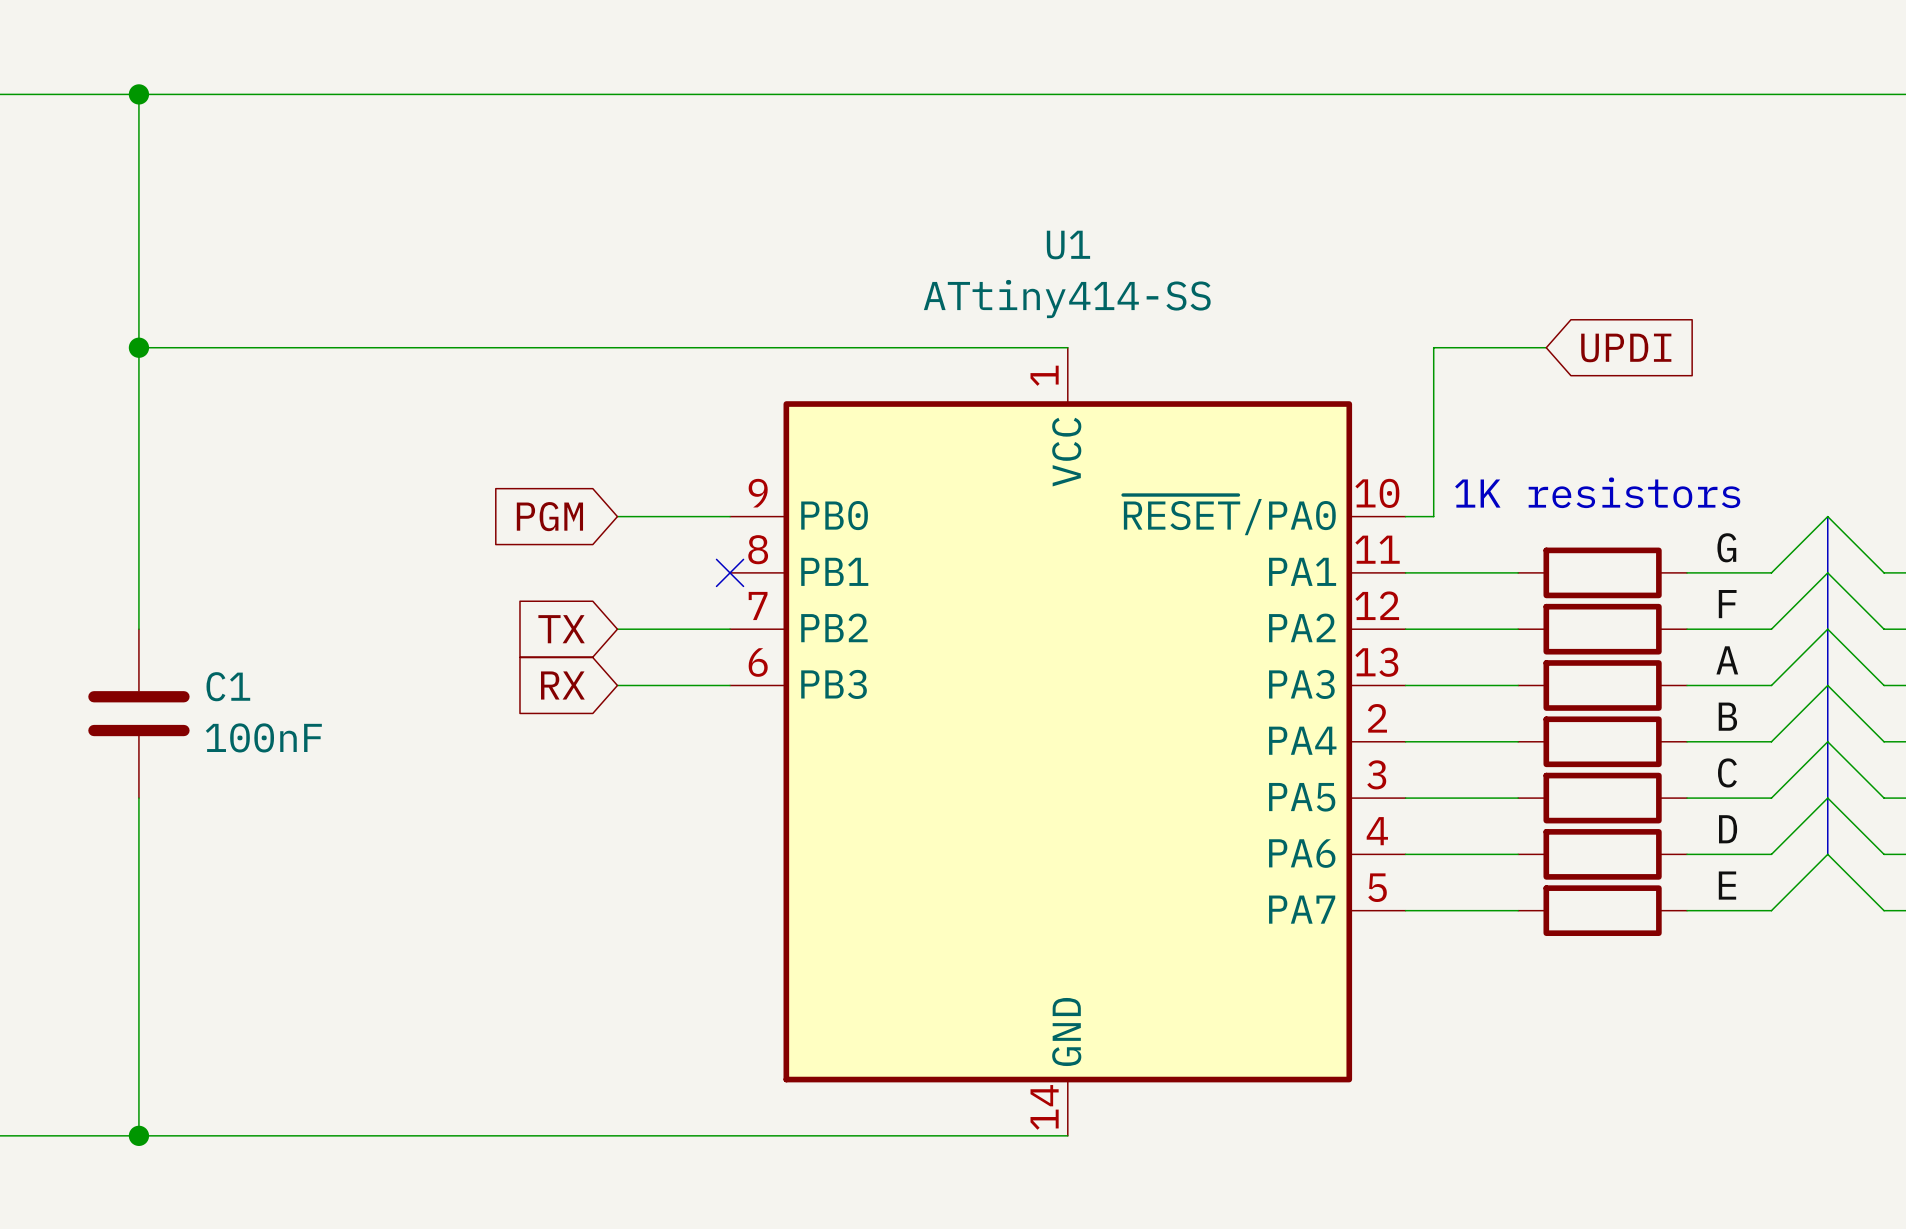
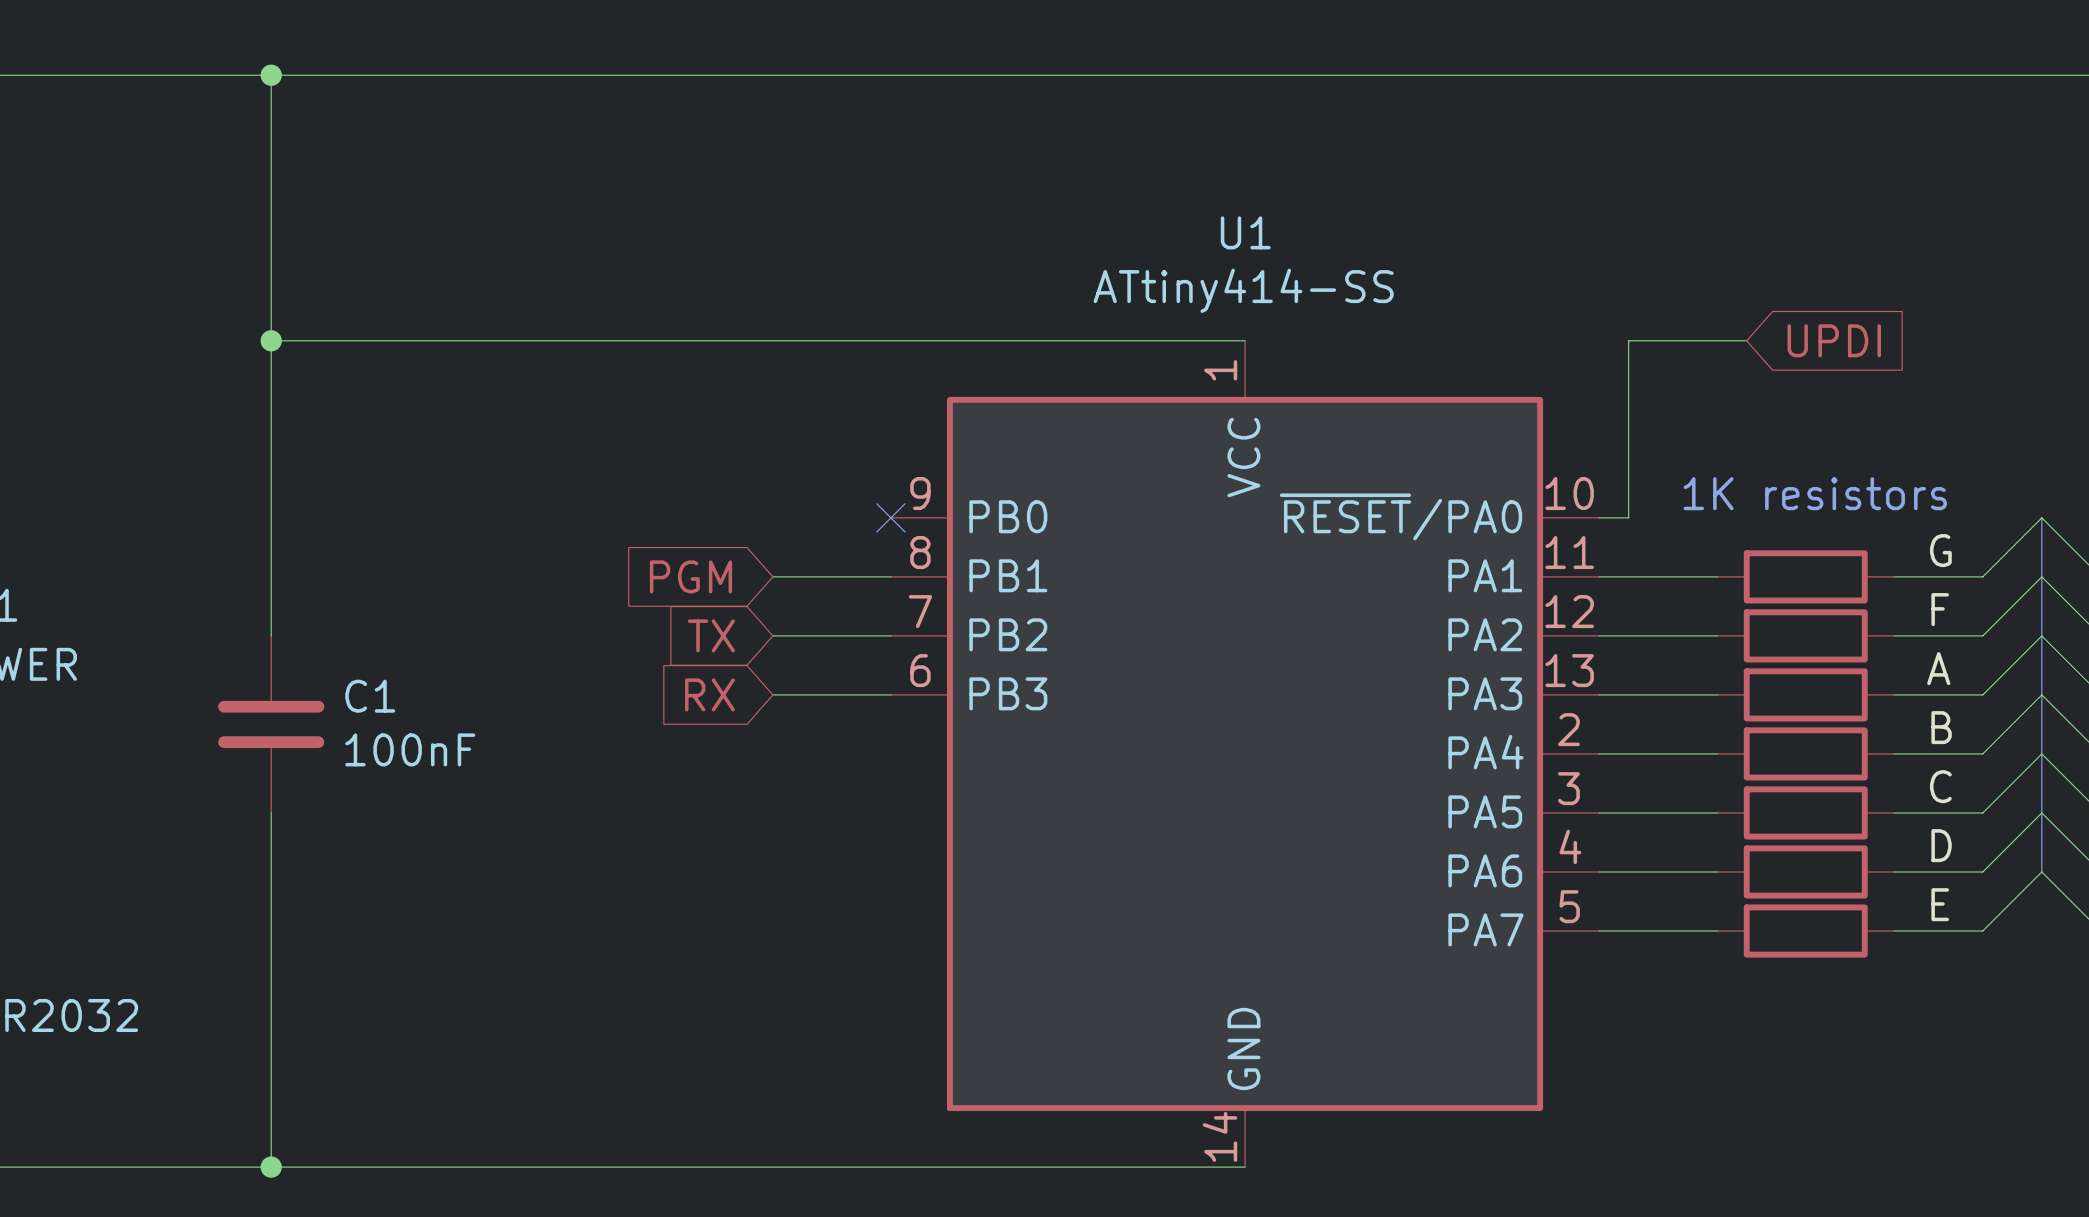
global label position: PGM (549, 516) -> PGM (690, 576)
wire: (617, 516) (730, 516) -> (772, 576) (890, 576)
no-connect mark position: (730, 572) -> (890, 517)

